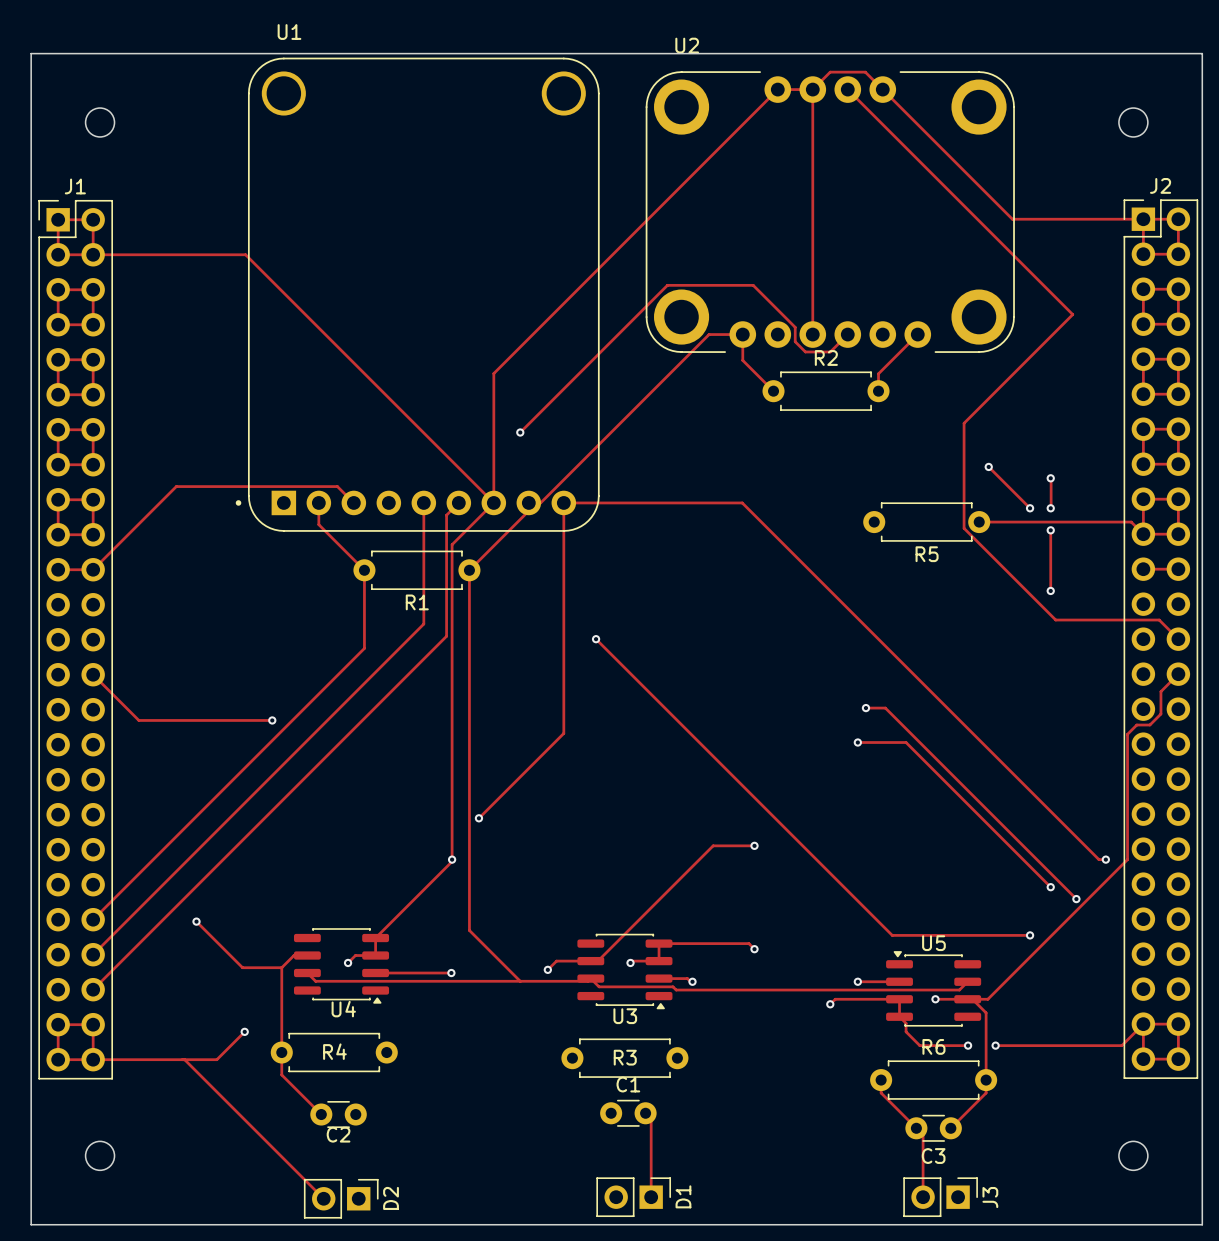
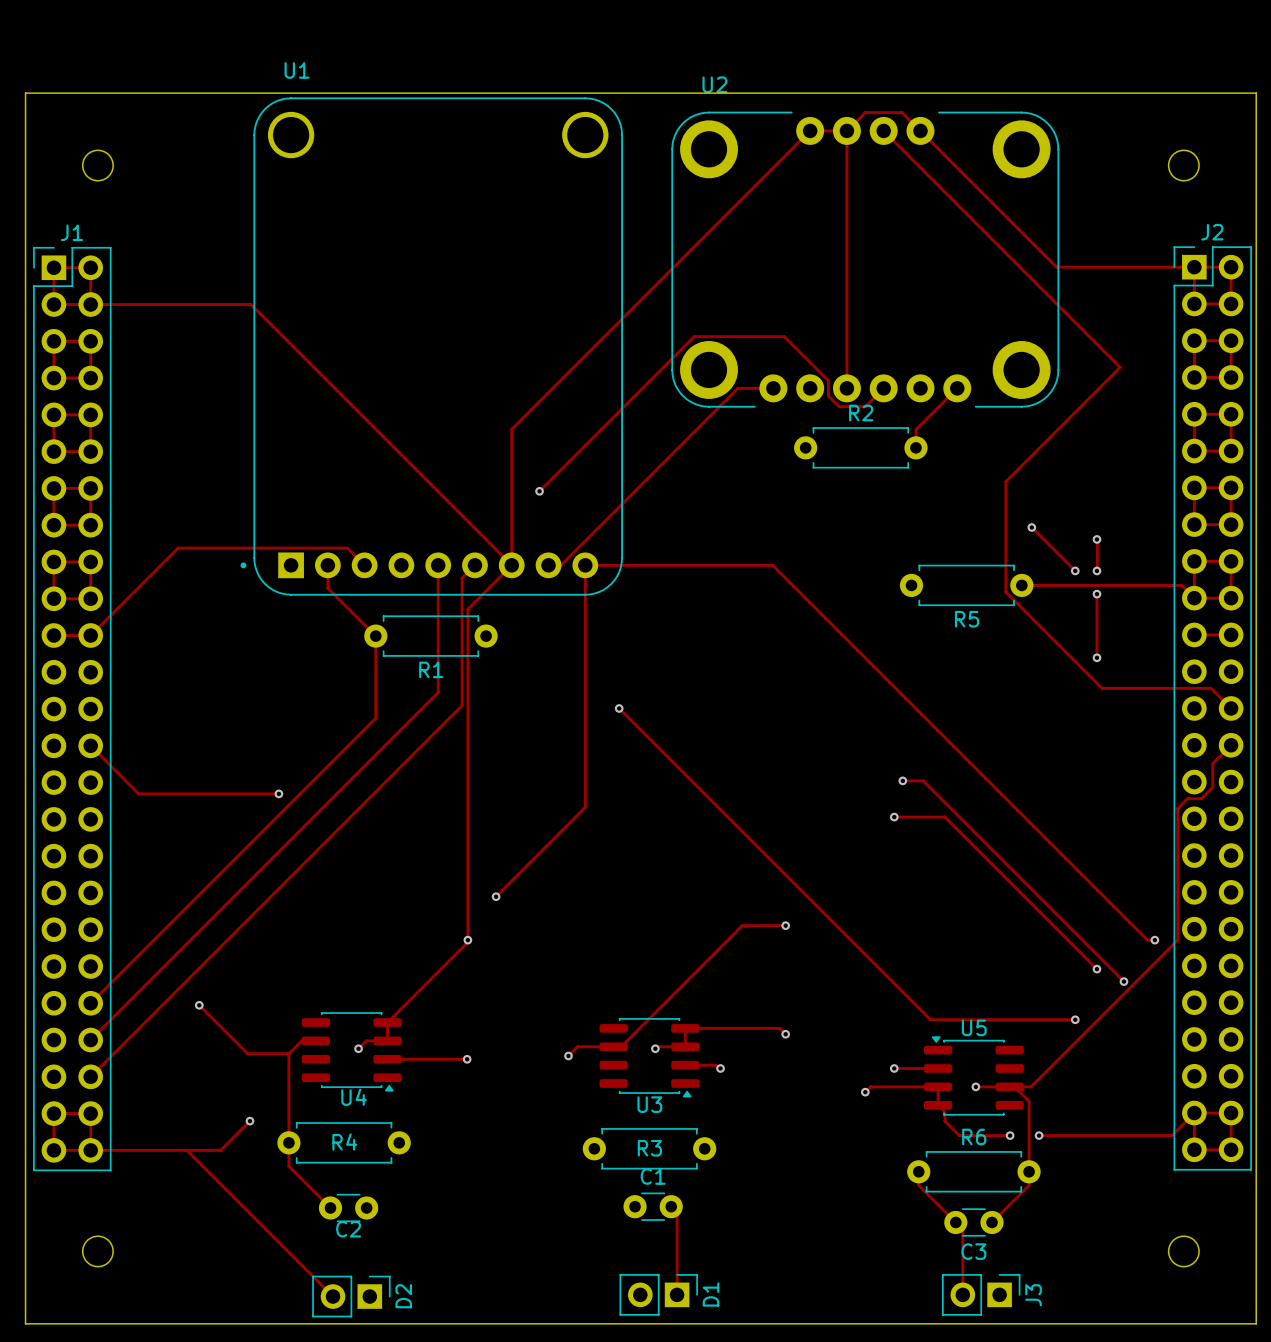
track: (742, 334) (742, 360) (773, 391) -> none
track: (528, 502) (528, 510) (469, 570) (469, 930) (520, 981) -> none
track: (307, 973) (315, 981) (588, 981) (590, 978) (599, 986) (673, 986) (676, 990) (959, 990) (967, 981) -> none

